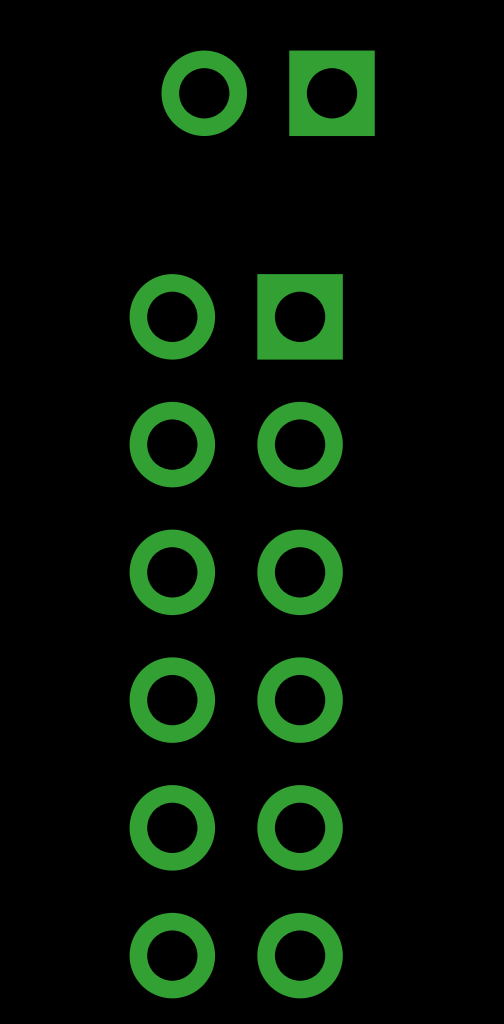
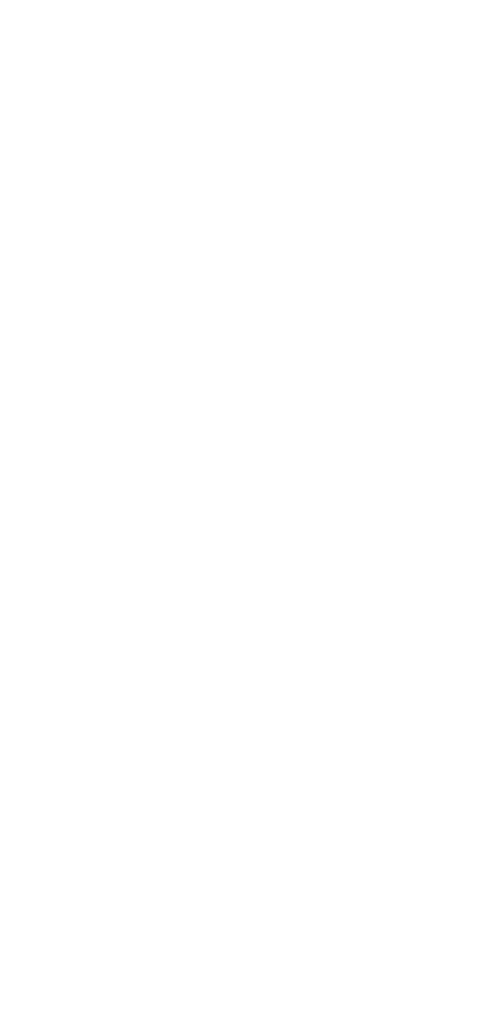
part: (268, 93) -> none
part: (236, 636) -> none

